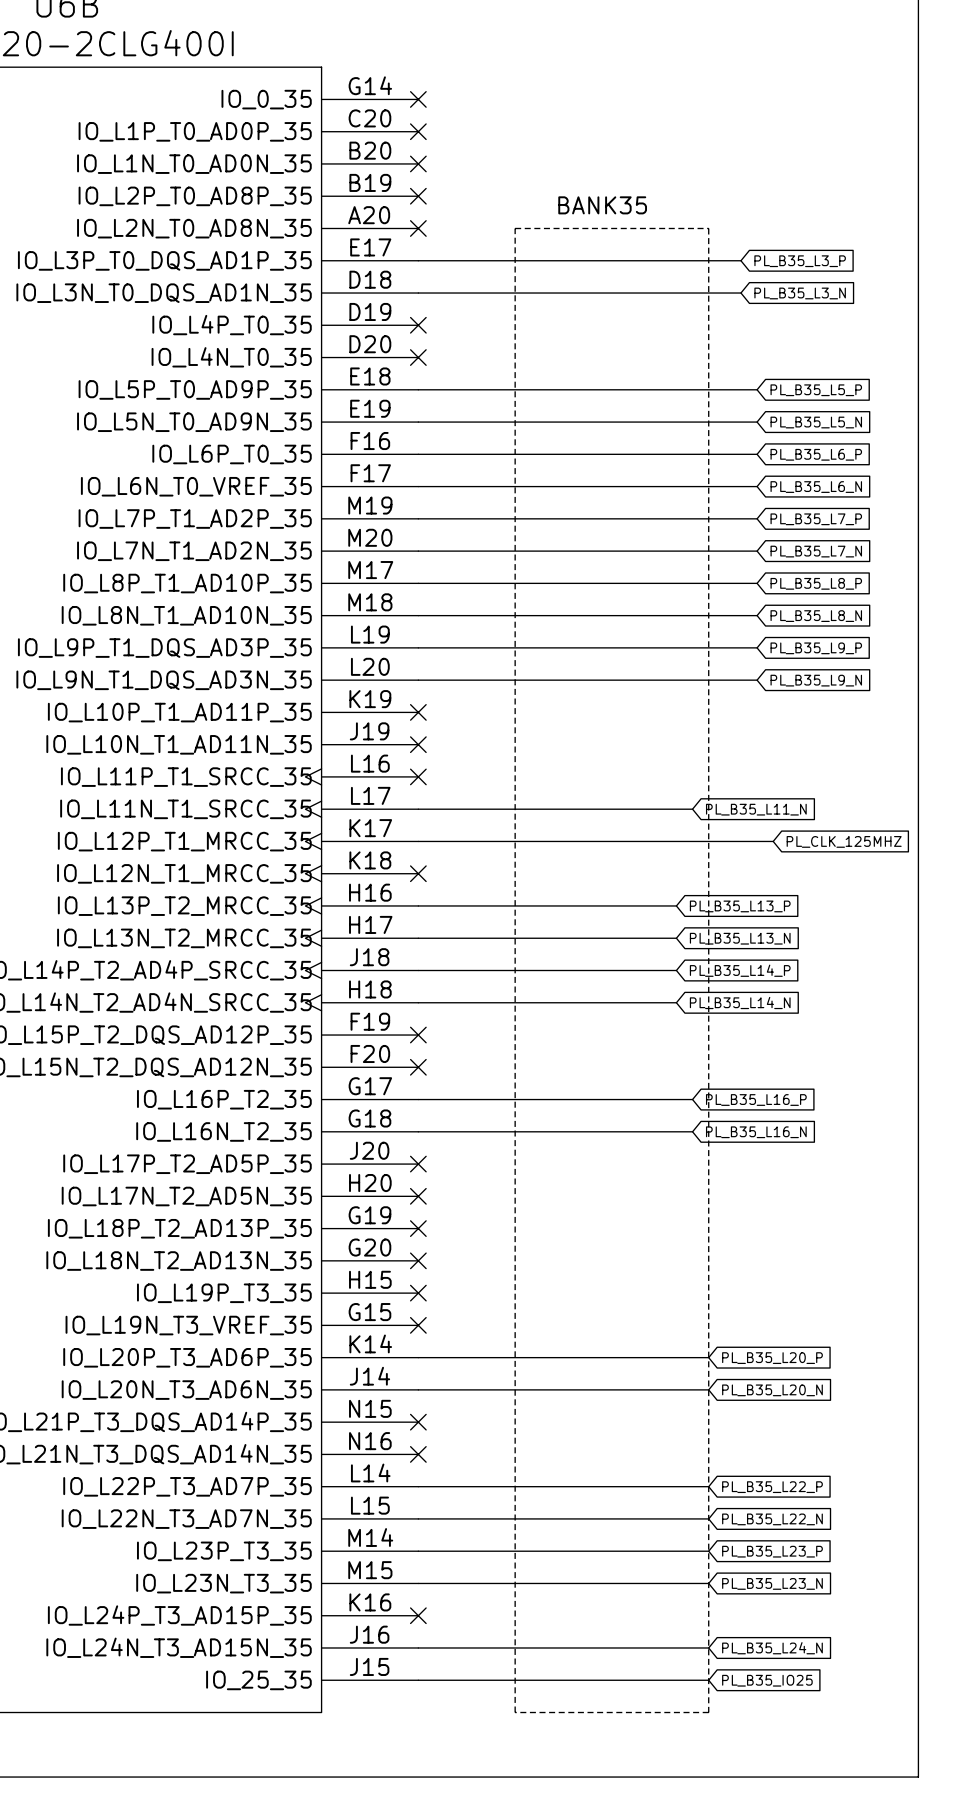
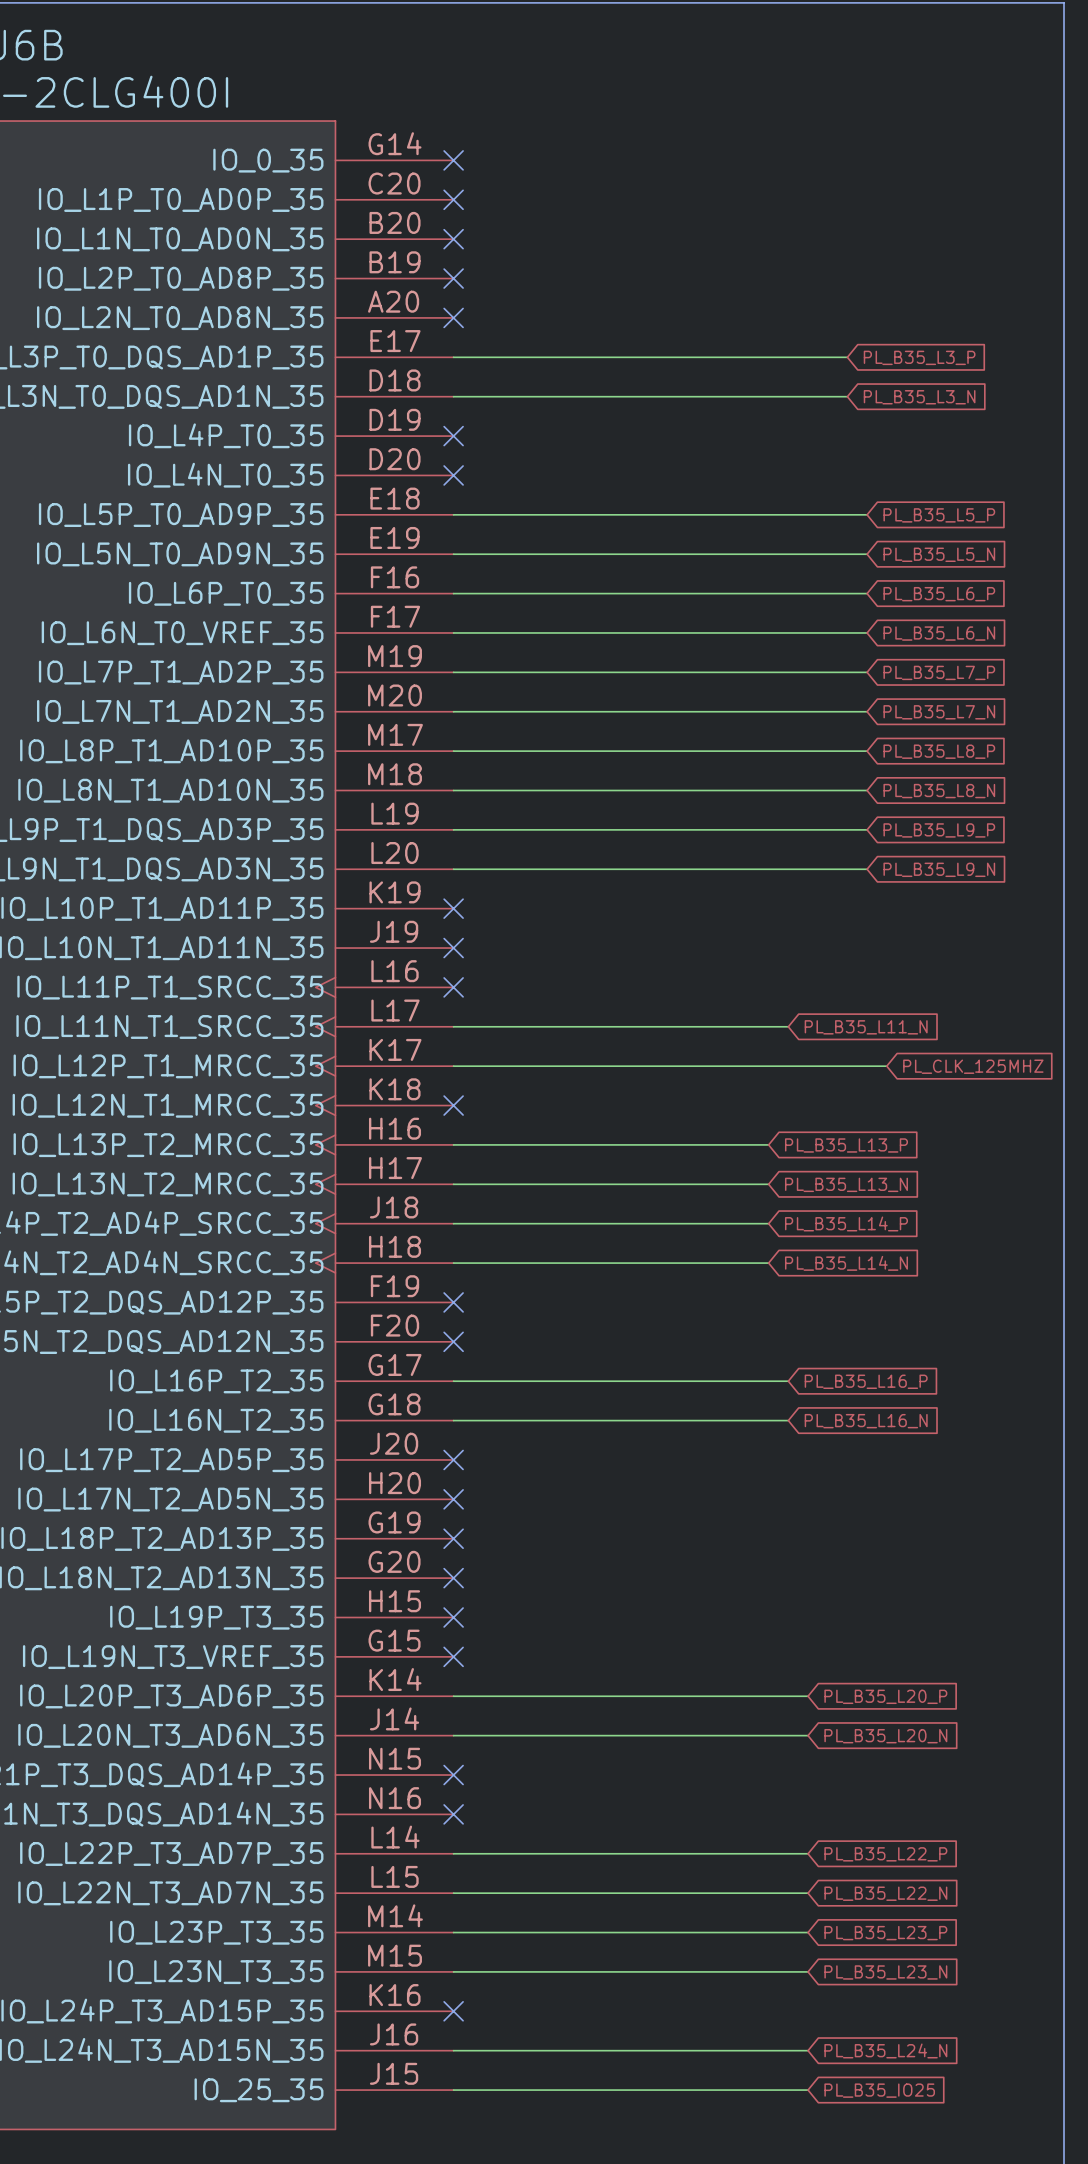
text: BANK35 (602, 205) -> none
line: (515, 228) (708, 228) (708, 1712) (515, 1712) (515, 228) -> none

